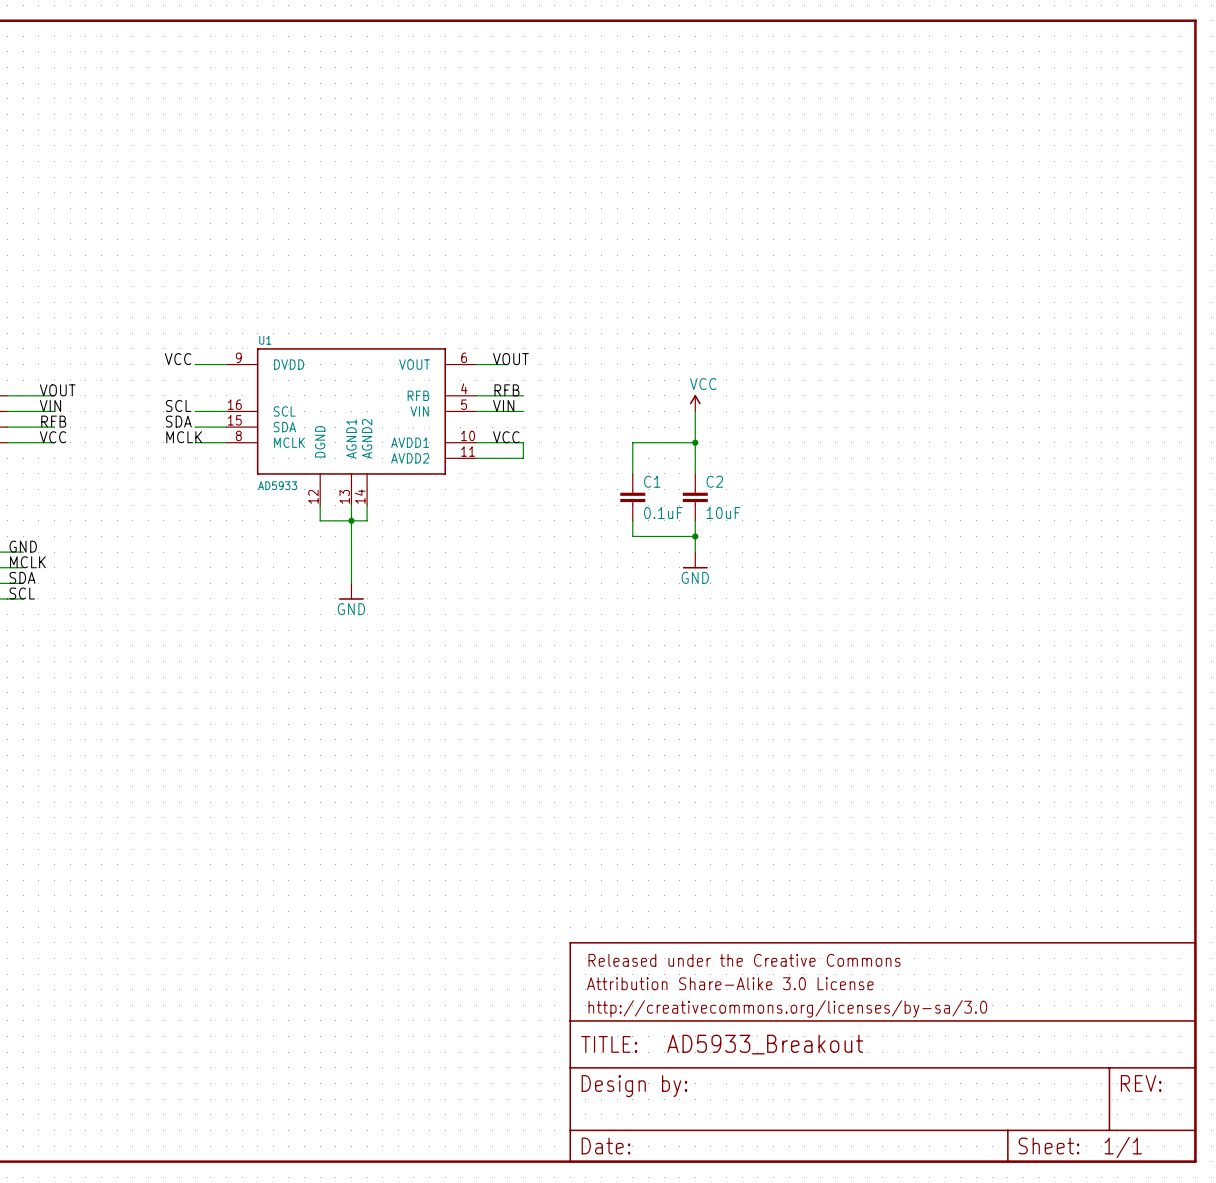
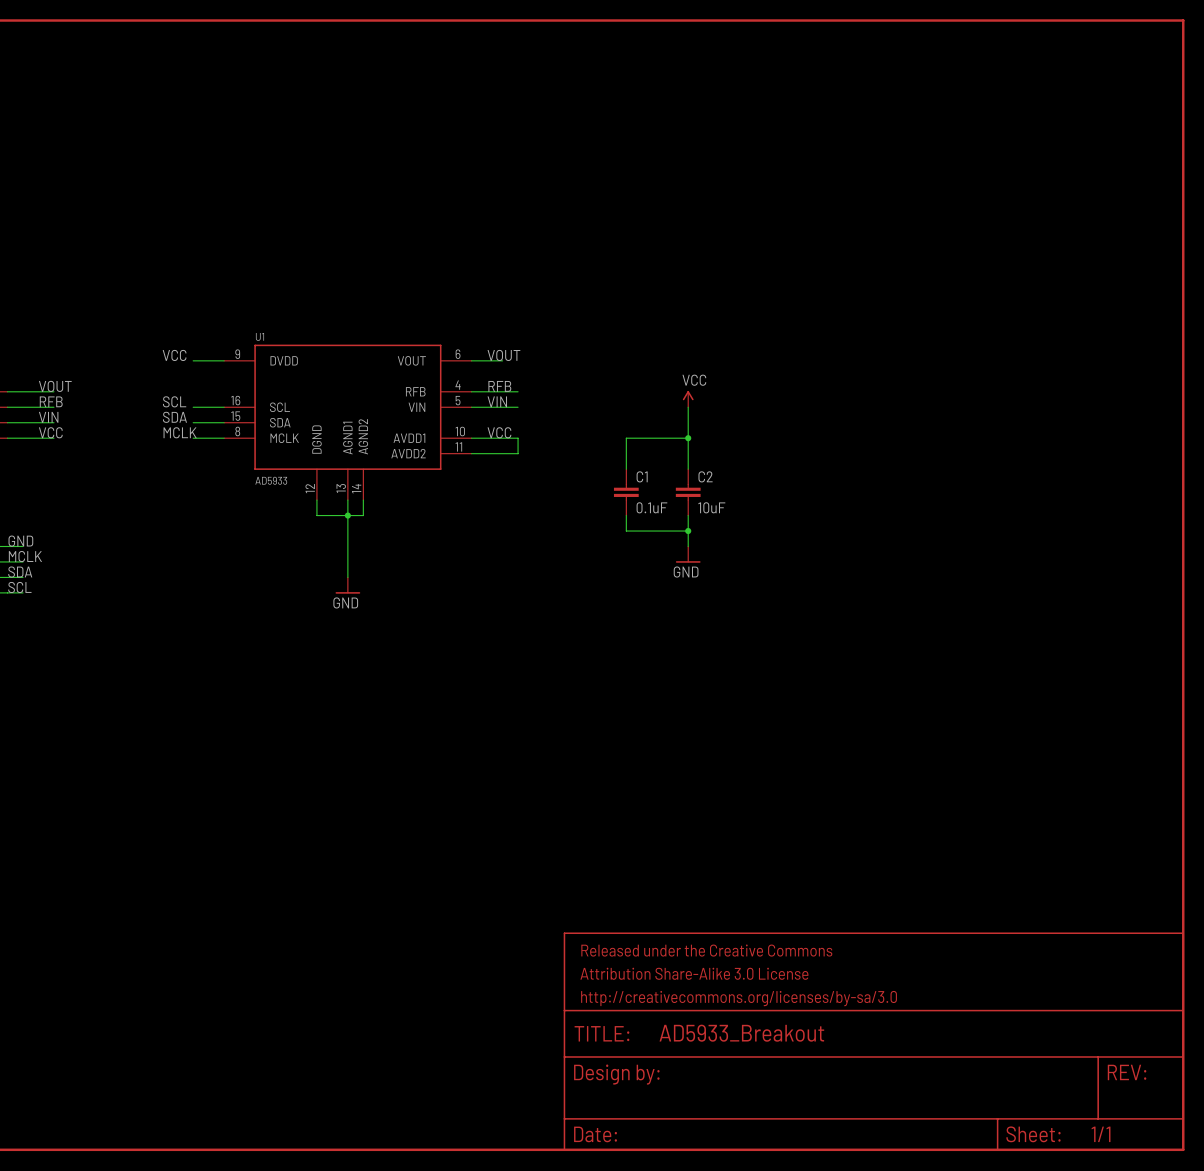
label: VIN (50, 405) -> RFB (51, 401)
label: RFB (53, 421) -> VIN (48, 417)

